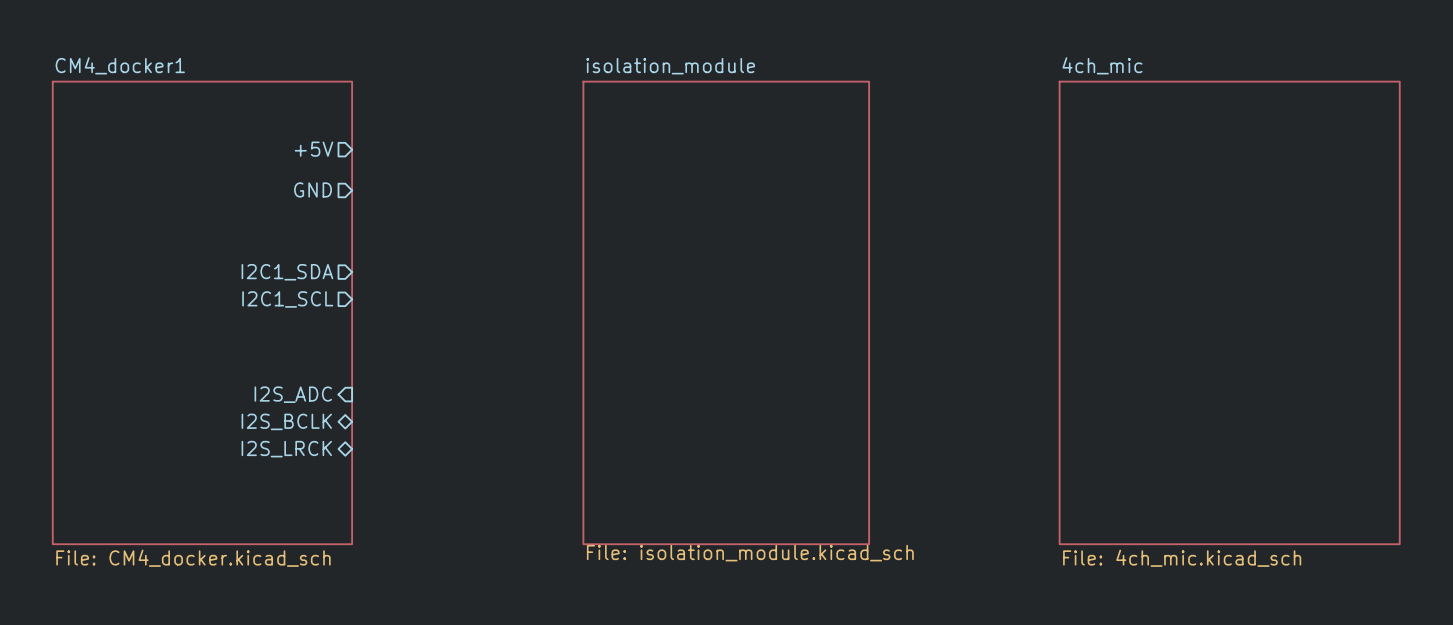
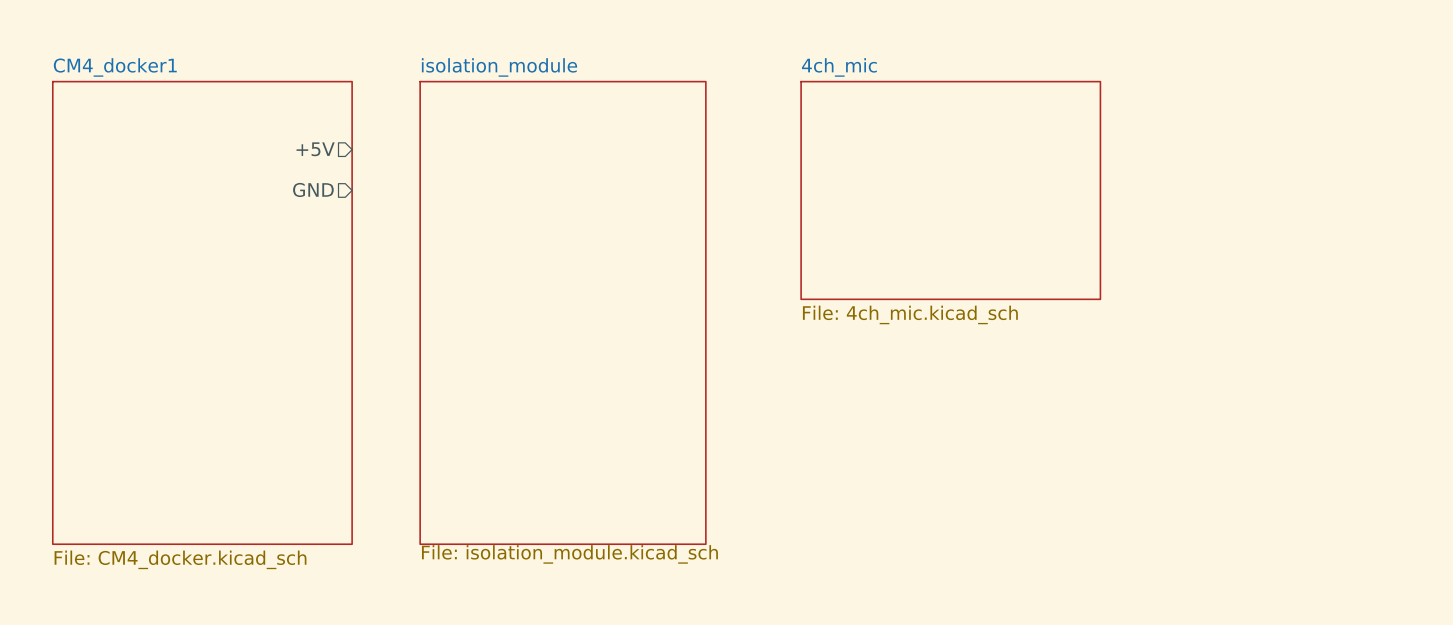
sheet 4ch_mic name position: 4ch_mic (1102, 65) -> 4ch_mic (839, 67)
sheet 4ch_mic shape: [1058, 80, 1401, 546] -> [800, 80, 1102, 301]
sheet pin: I2C1_SDA (287, 272) -> none
sheet pin: I2C1_SCL (287, 299) -> none
sheet isolation_module position: (726, 312) -> (562, 312)
sheet pin: I2S_ADC (293, 394) -> none
sheet pin: I2S_BCLK (286, 421) -> none
sheet pin: I2S_LRCK (286, 449) -> none
sheet 4ch_mic value position: File: 4ch_mic.kicad_sch (1182, 558) -> File: 4ch_mic.kicad_sch (910, 314)

